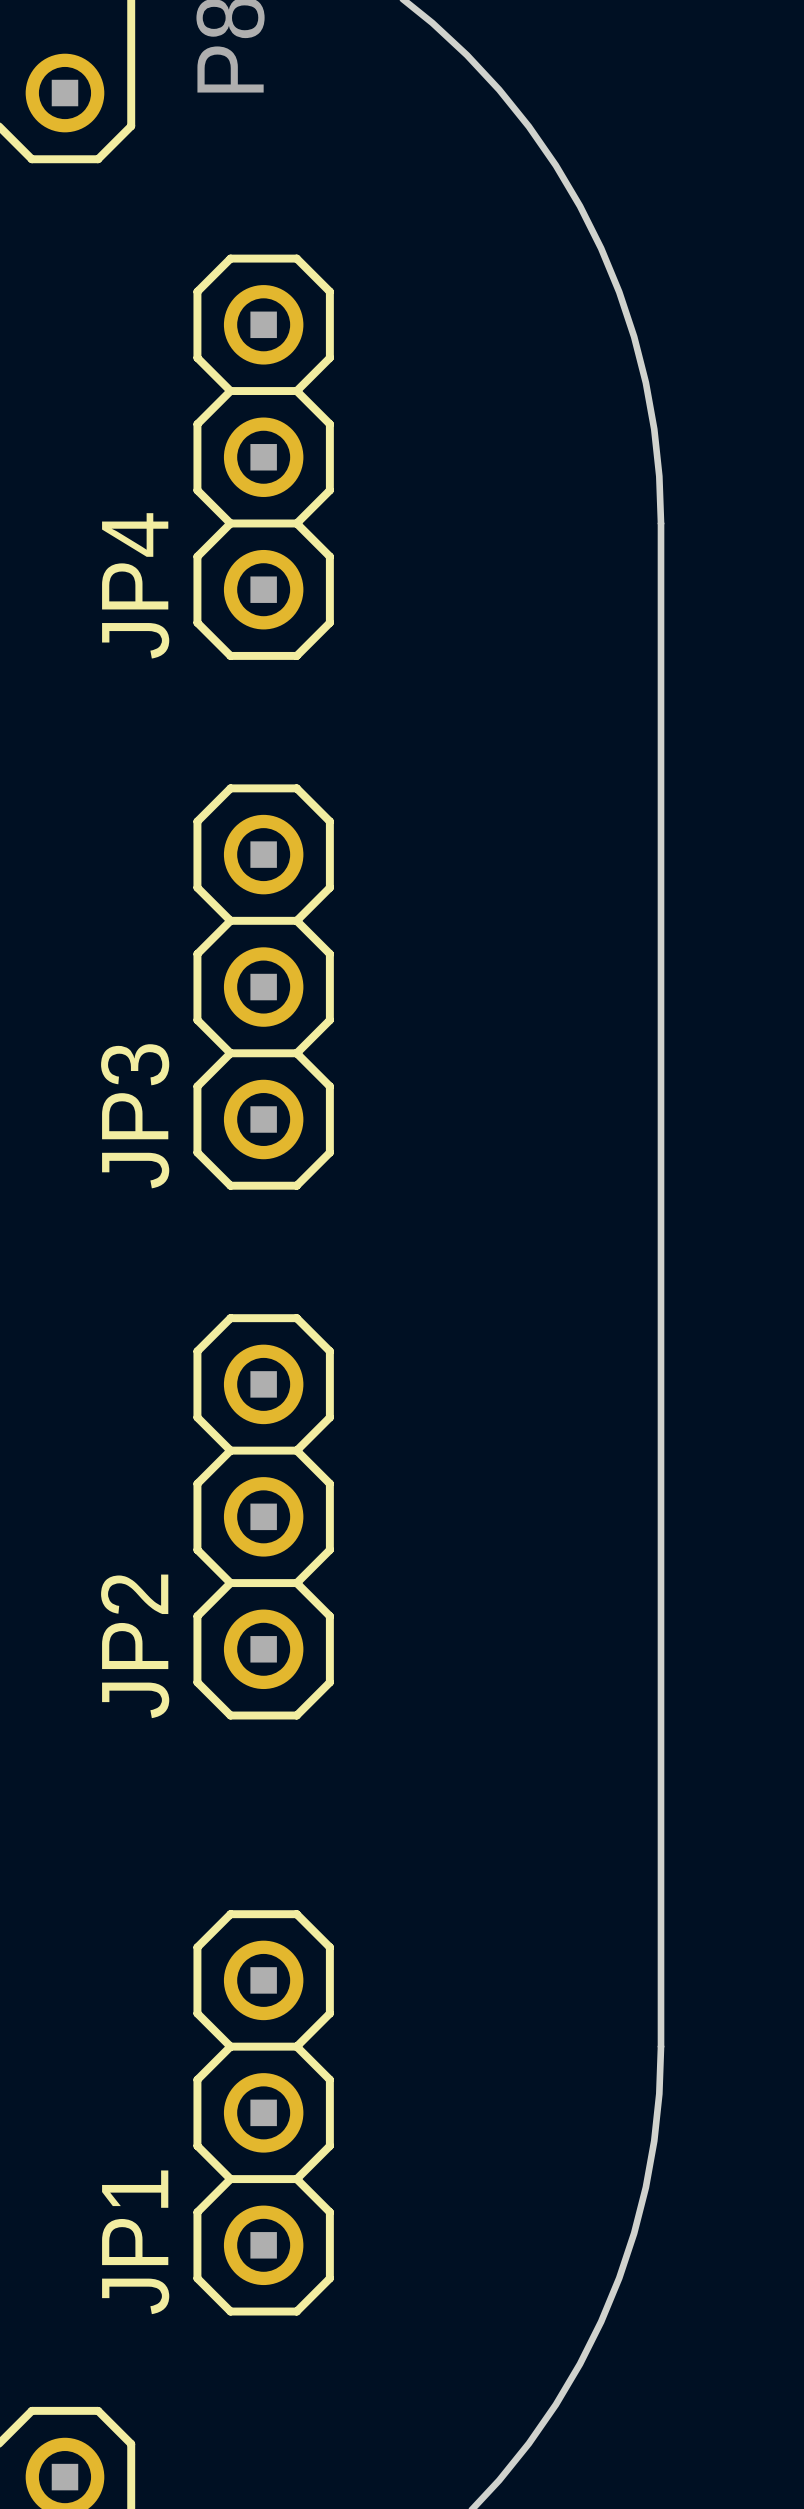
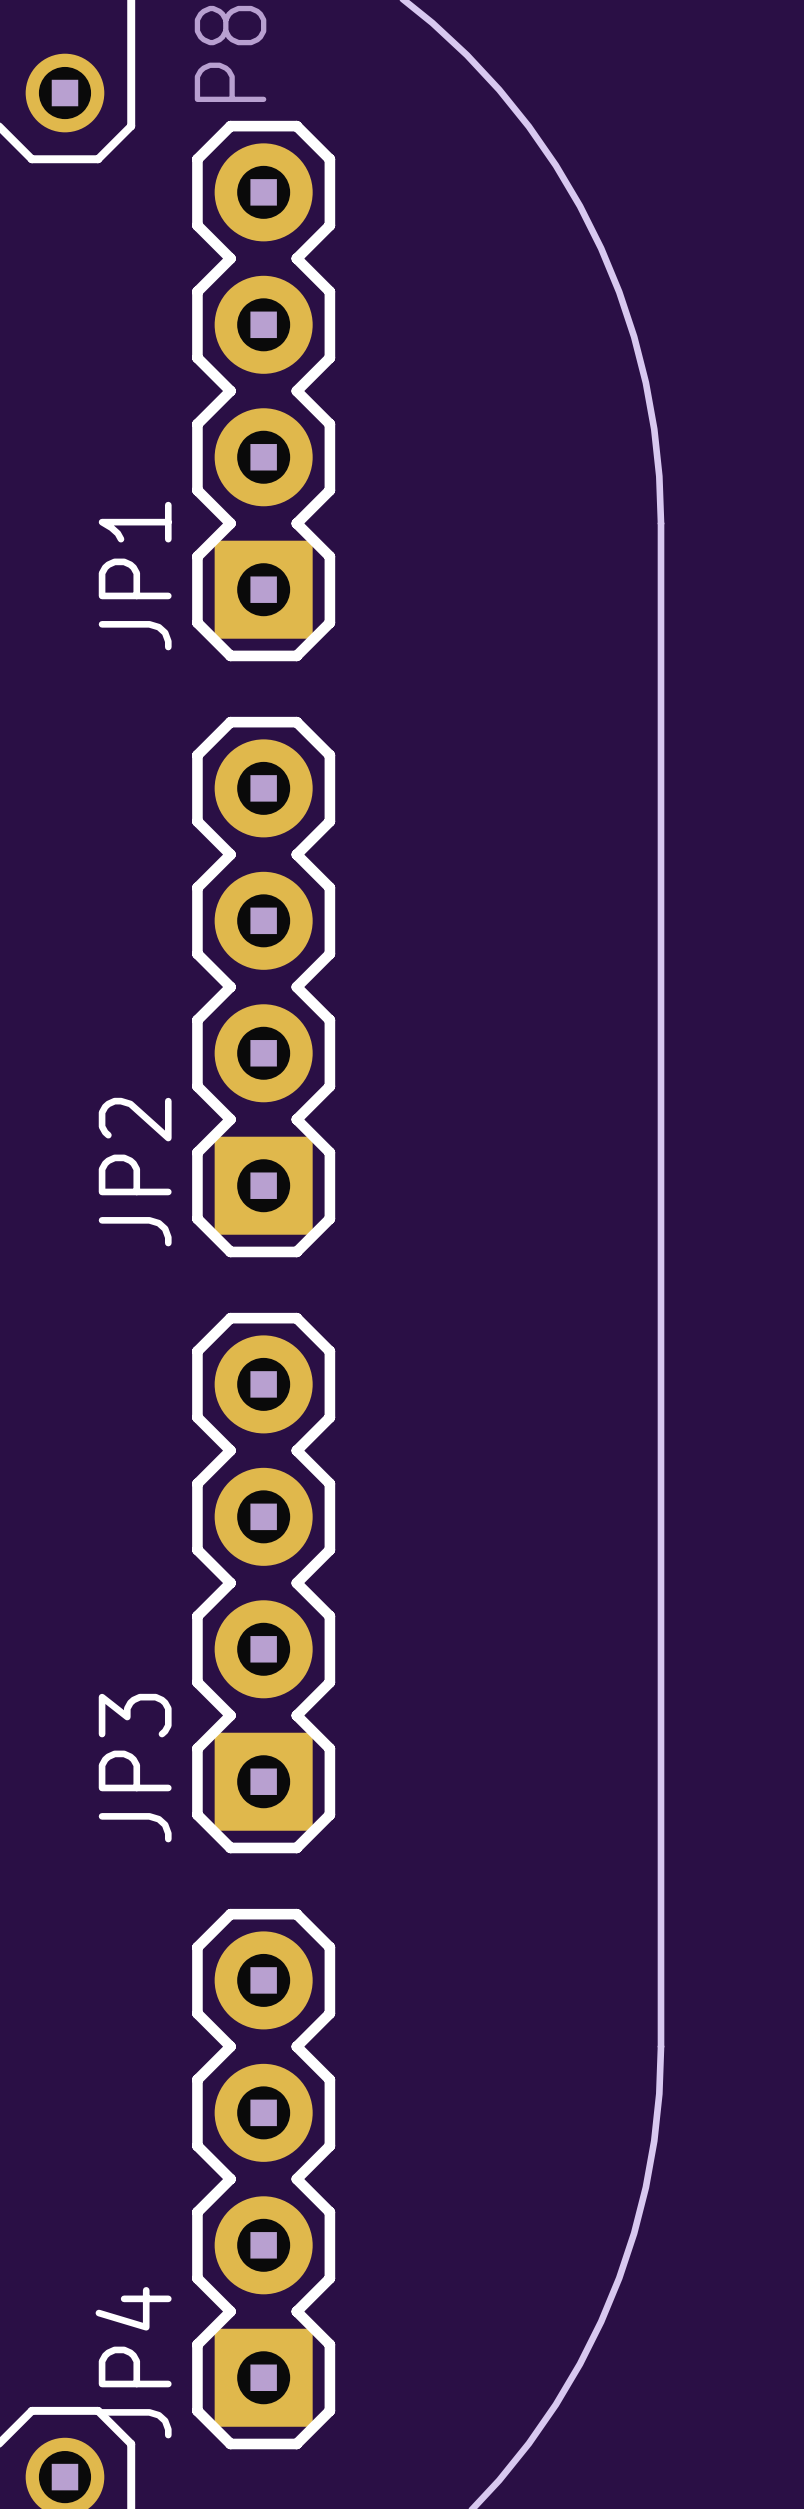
JP4 footprint: [193, 254, 334, 660] -> [192, 1908, 336, 2450]
JP3 footprint: [193, 784, 334, 1190] -> [192, 1312, 336, 1854]
JP2 footprint: [193, 1314, 334, 1720] -> [192, 716, 336, 1258]
JP1 footprint: [193, 1910, 334, 2316] -> [192, 120, 336, 662]

